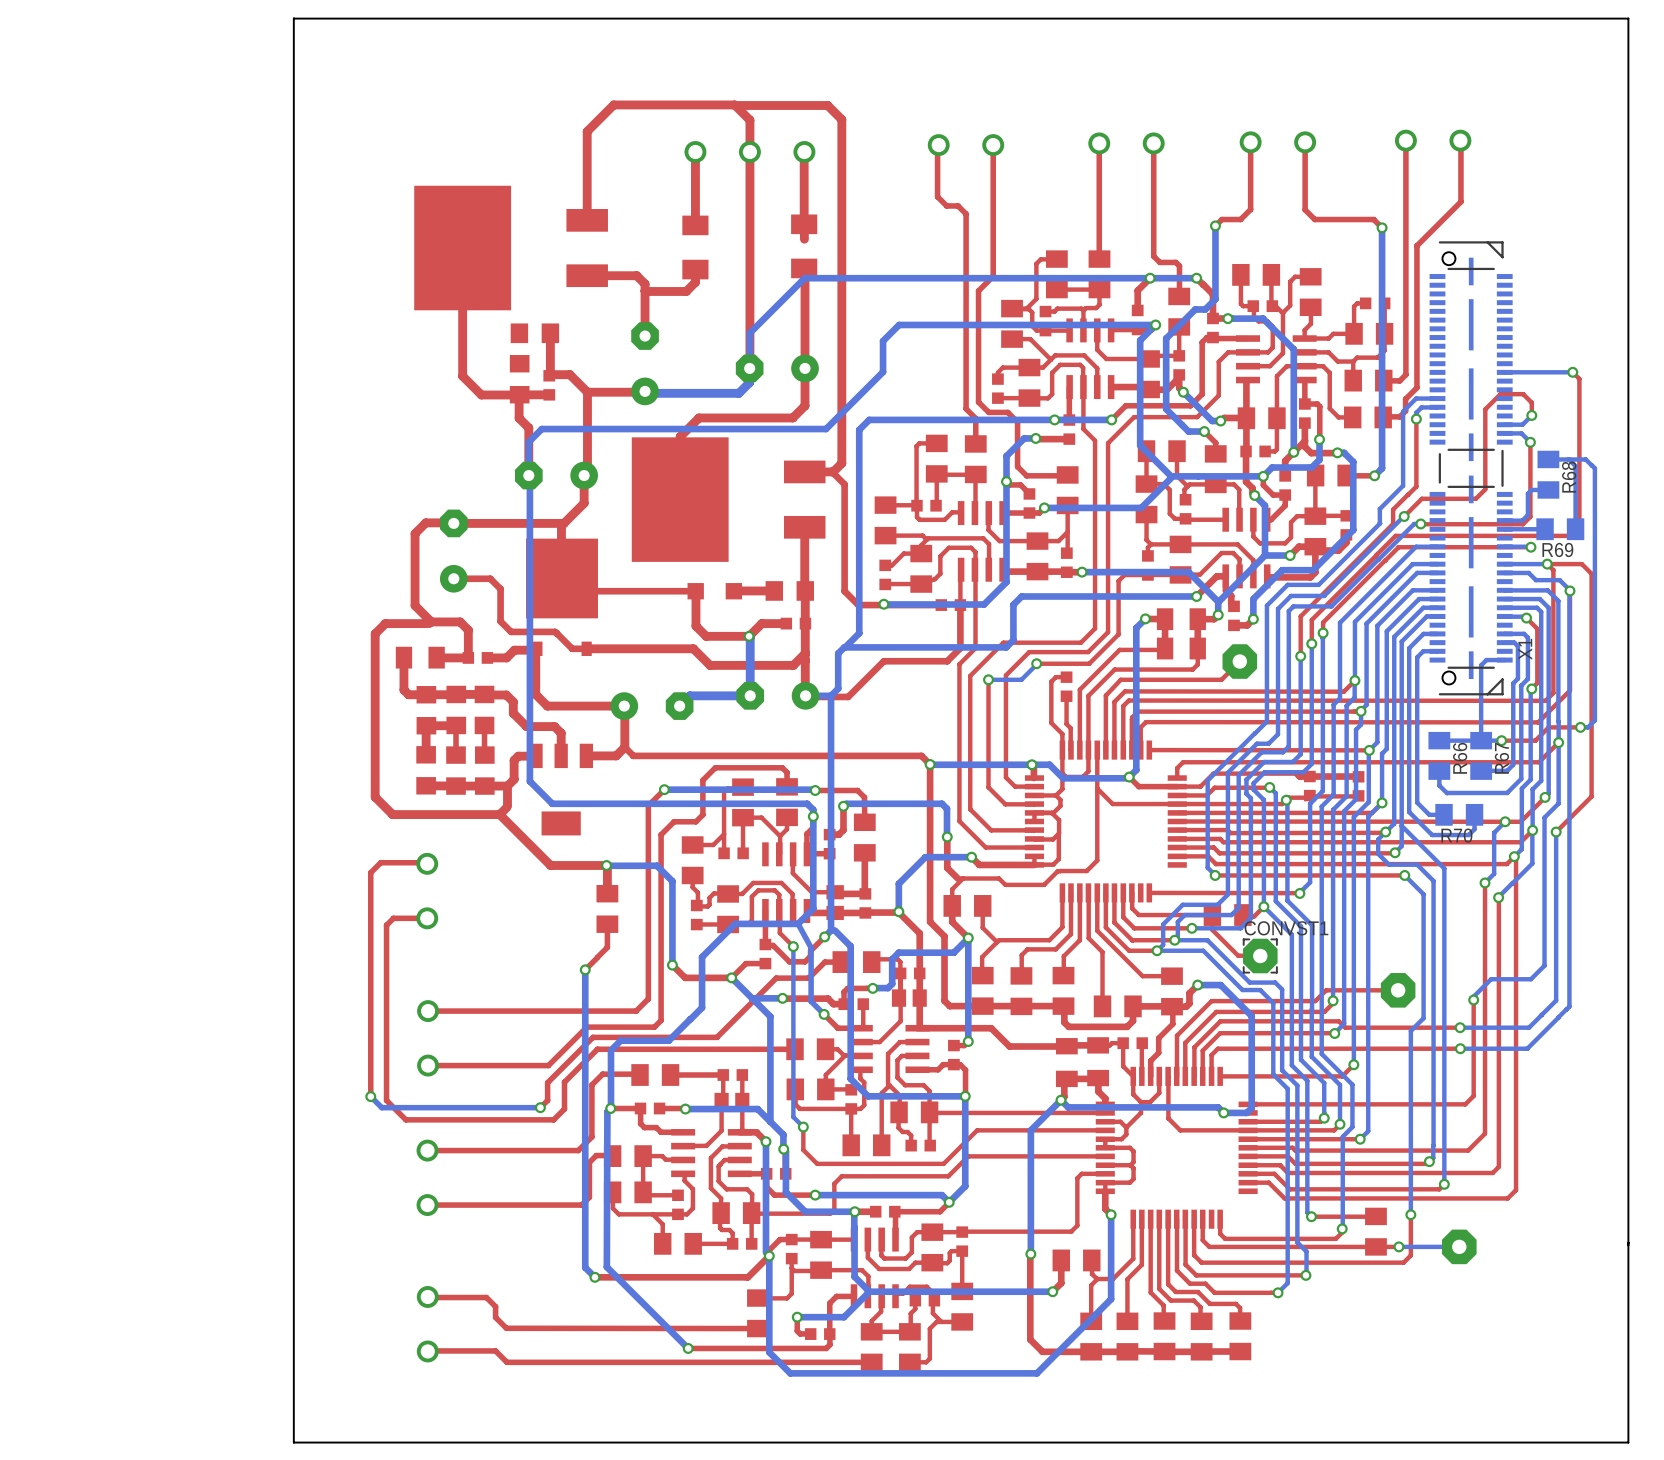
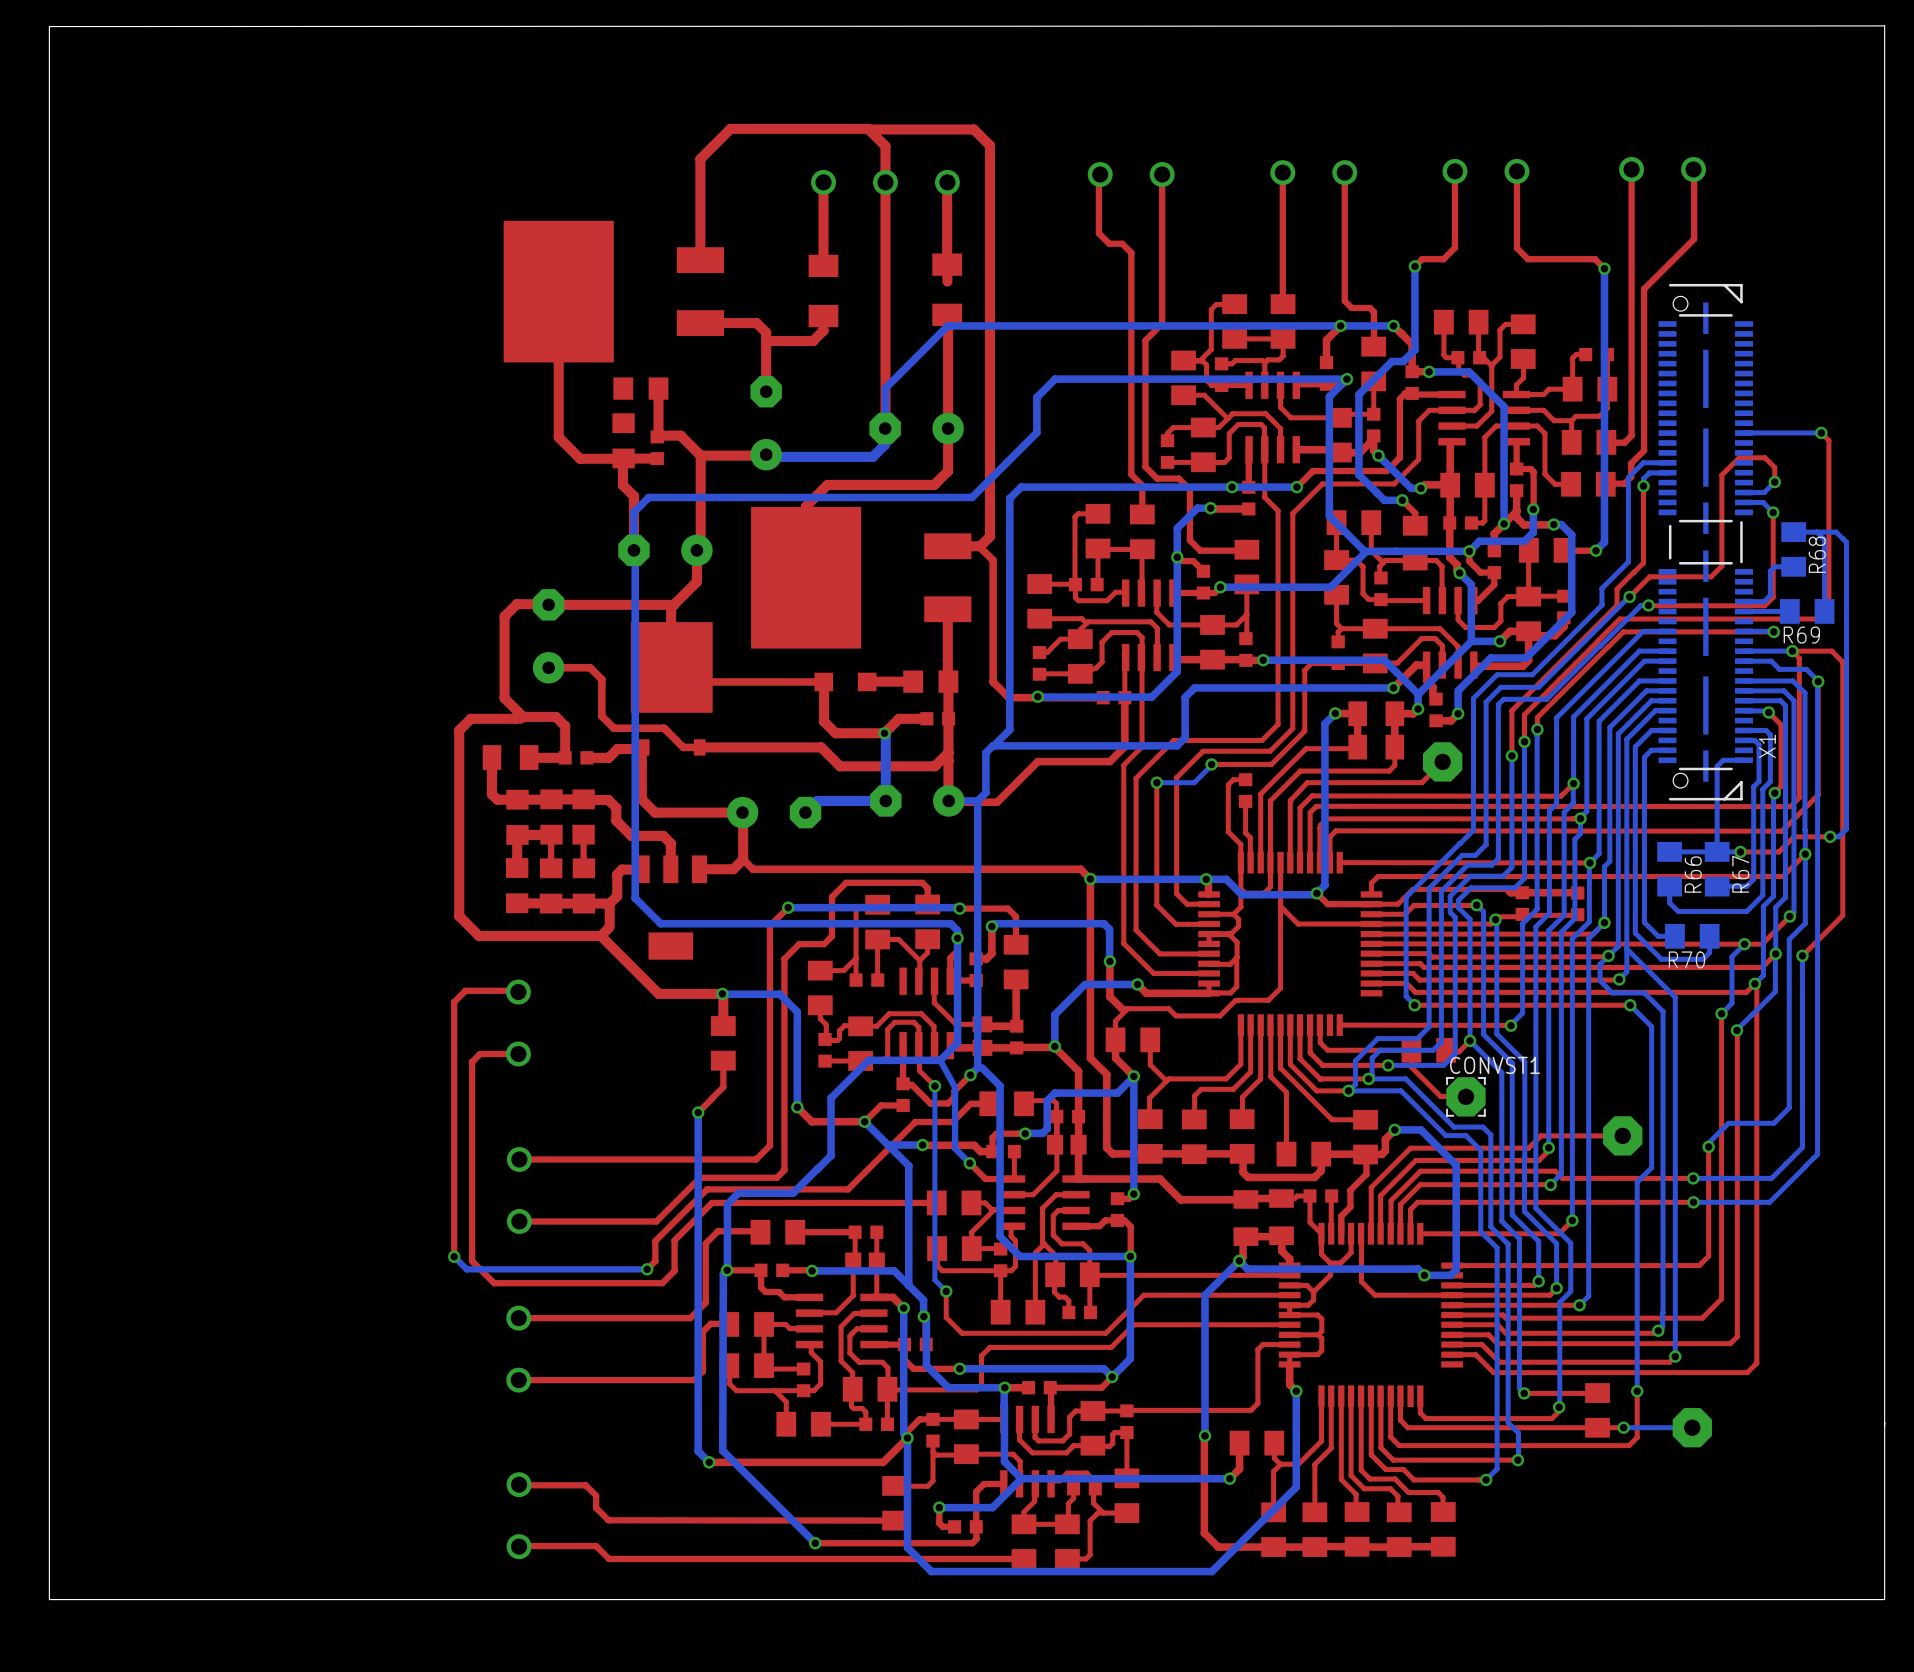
board edge: none -> (49, 26) (1884, 25) (1884, 30)
board edge: (1628, 18) (293, 18) (293, 1442) (1628, 1442) (1628, 1398) -> (50, 26) (49, 1599) (1884, 1599)

